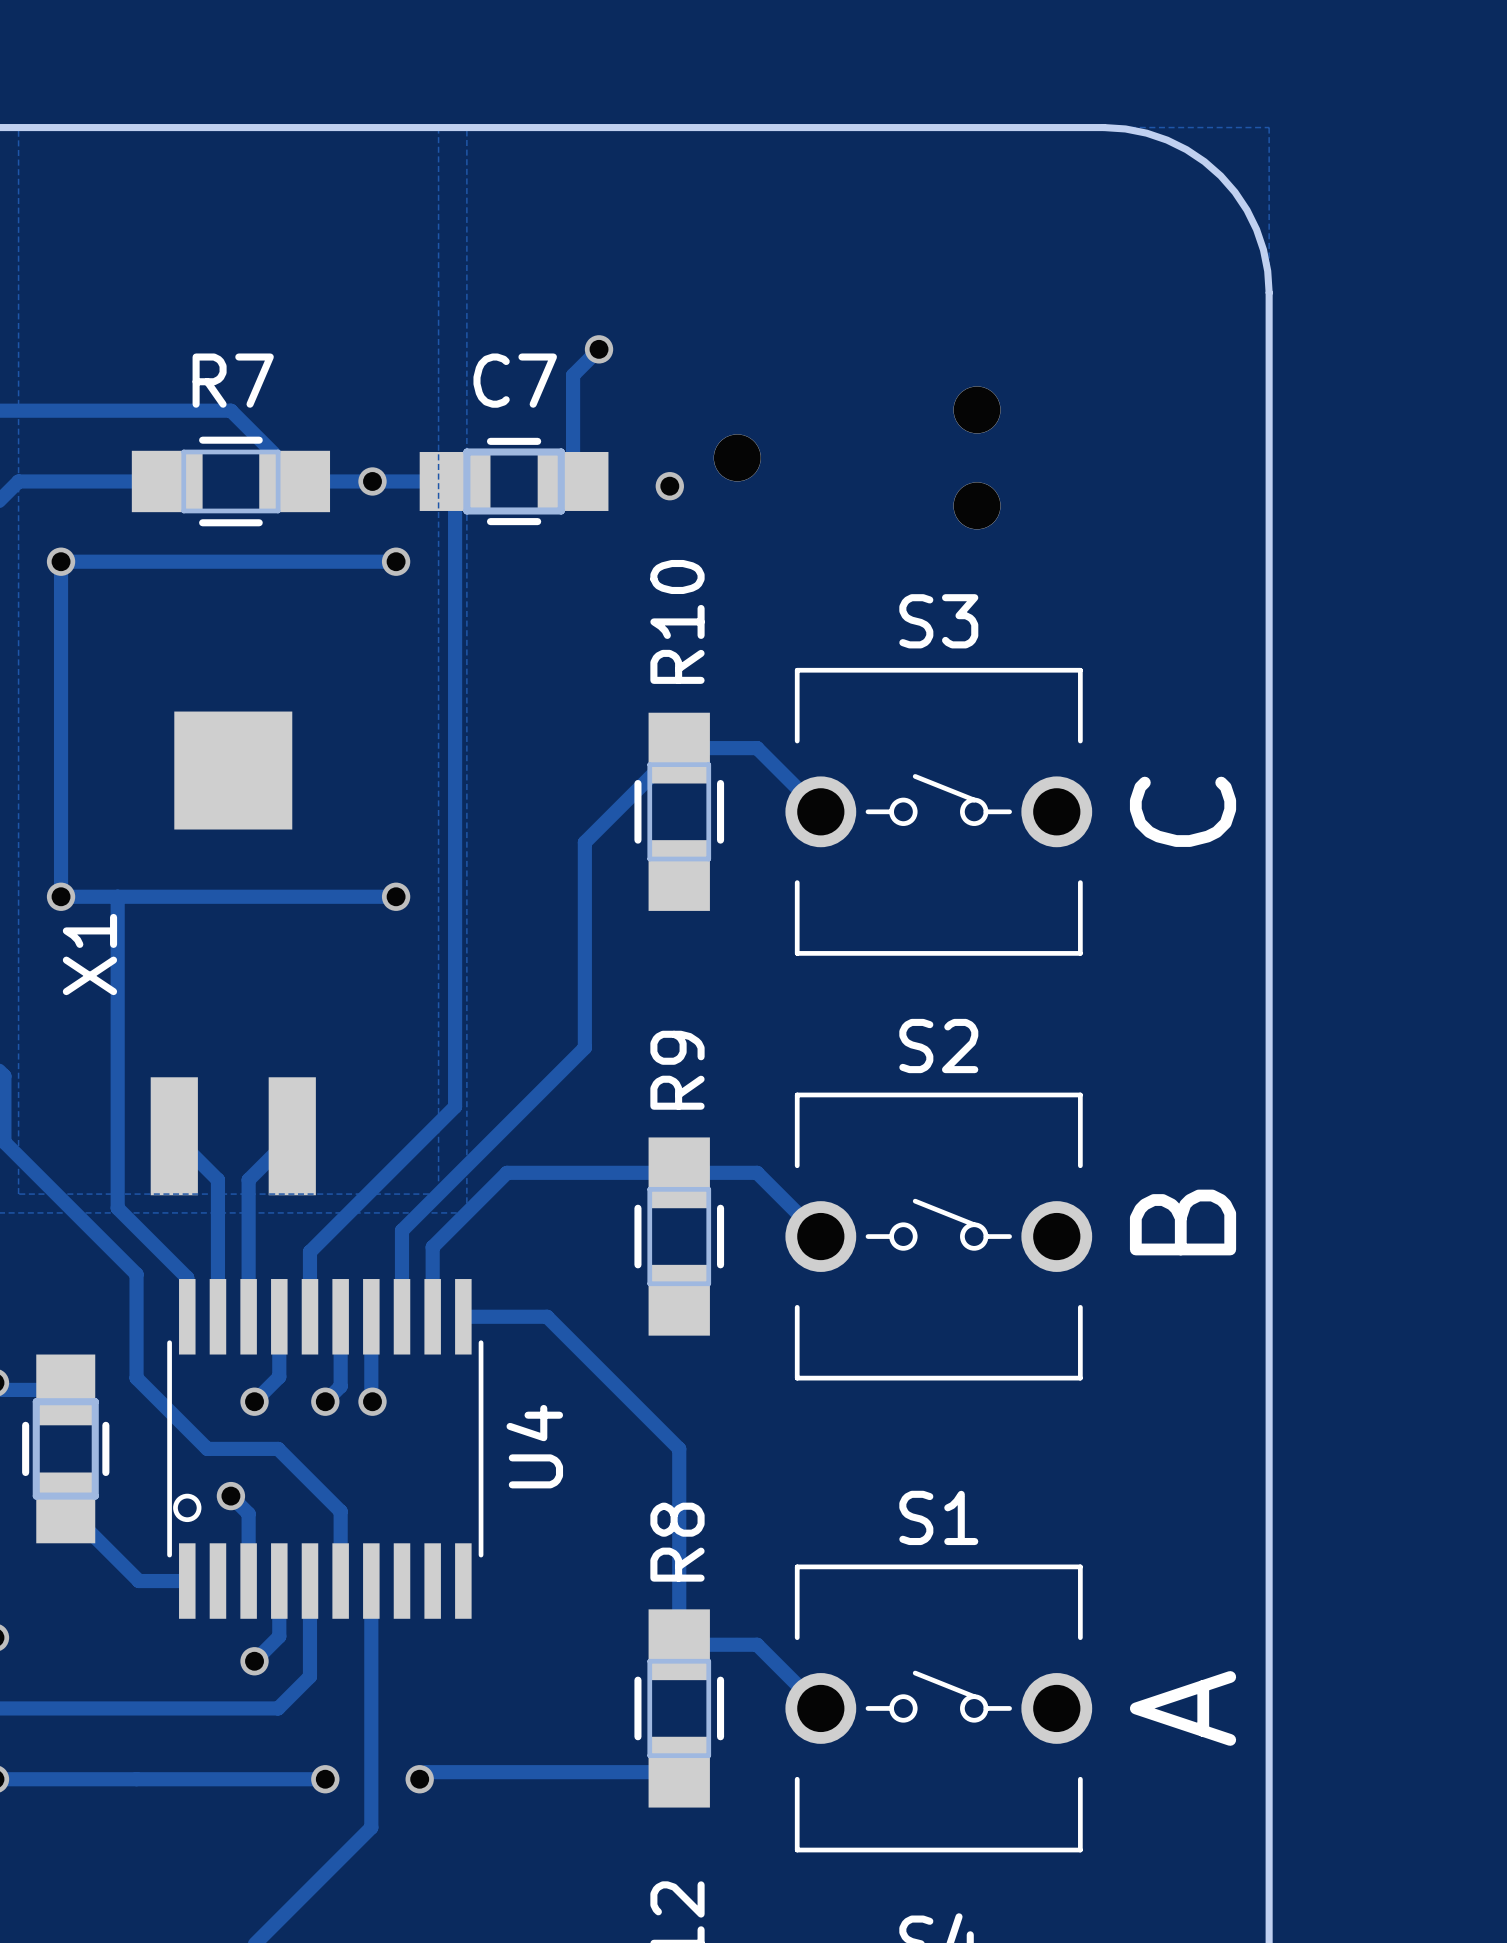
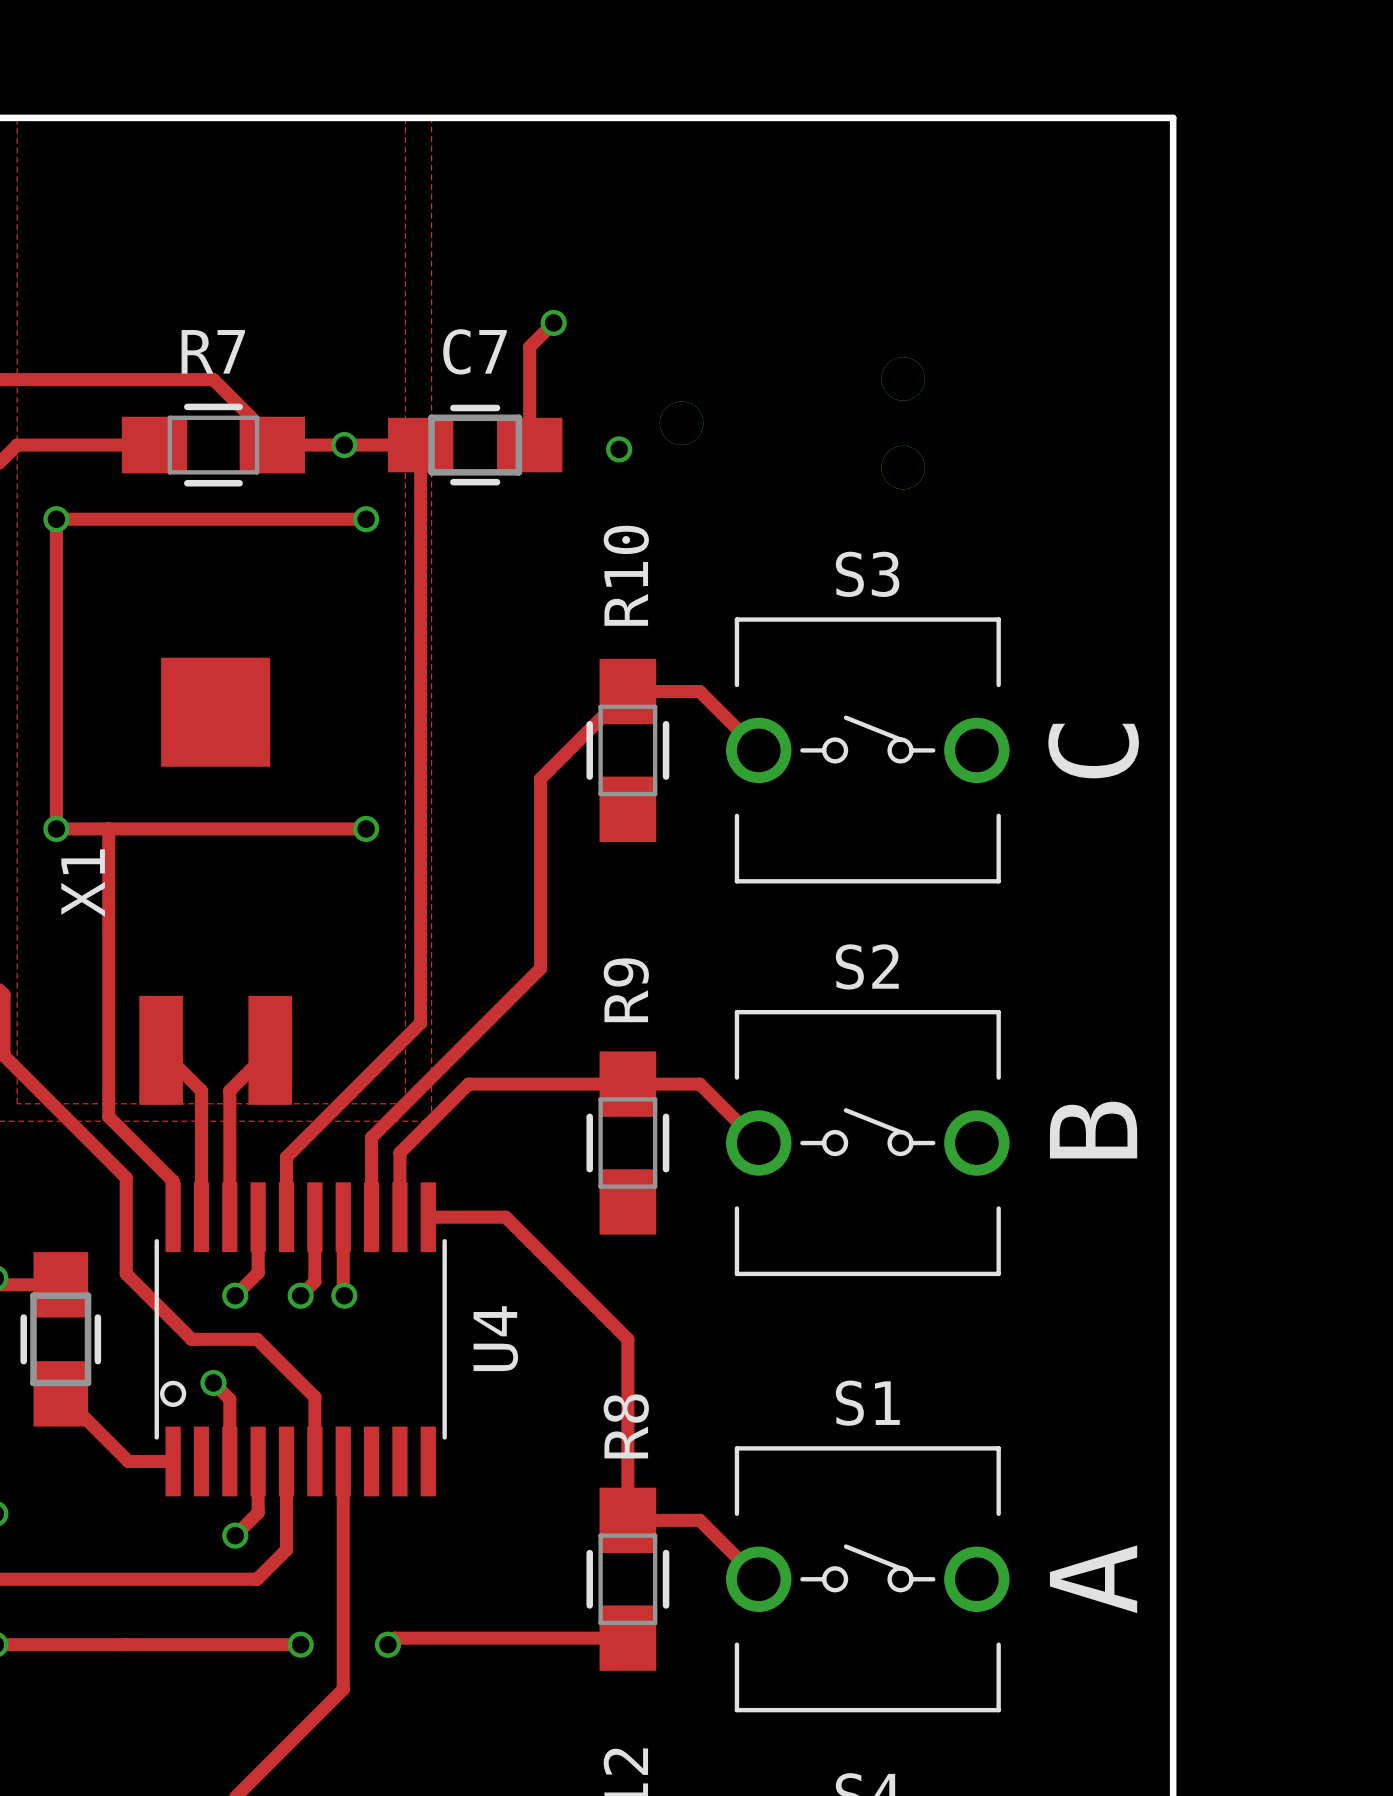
board edge: (1103, 127) (1146, 133) (1167, 140) (1204, 161) (1220, 175) (1235, 192) (1256, 229) (1263, 249) (1269, 292) -> (1020, 117) (1173, 117) (1173, 270)

